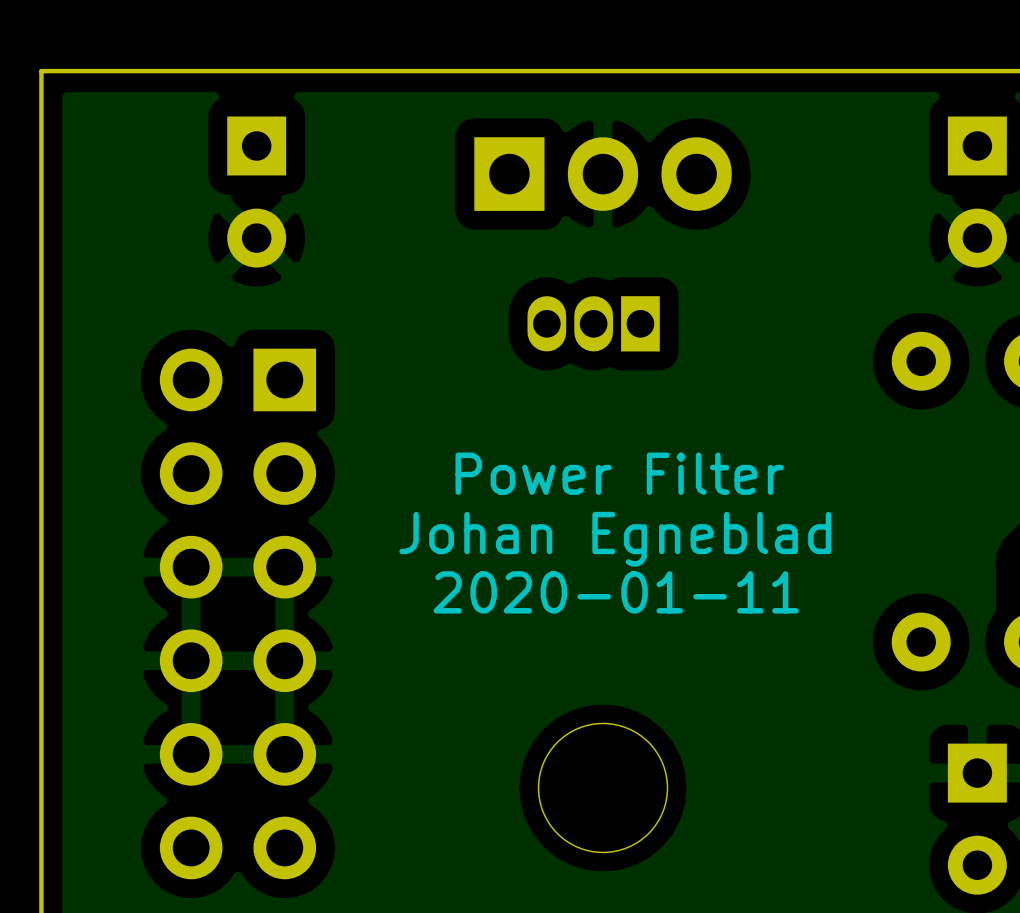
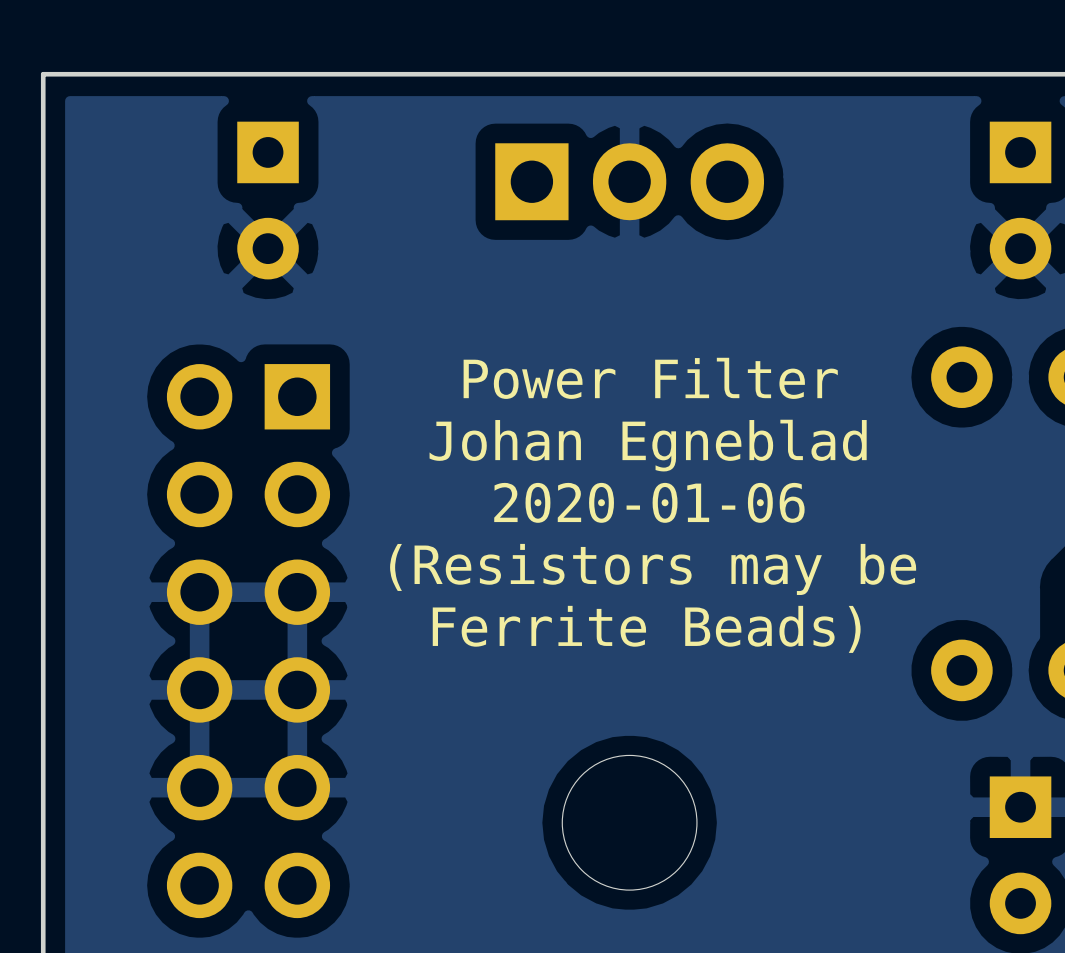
part: (593, 323) -> none
text: none -> Power Filter (650, 378)
text: none -> Johan Egneblad (648, 445)
text: Power Filter (619, 473) -> 2020-01-06 (649, 502)
text: Johan Egneblad (615, 539) -> (Resistors may be (653, 569)
text: 2020-01-11 (616, 592) -> Ferrite Beads) (646, 629)

